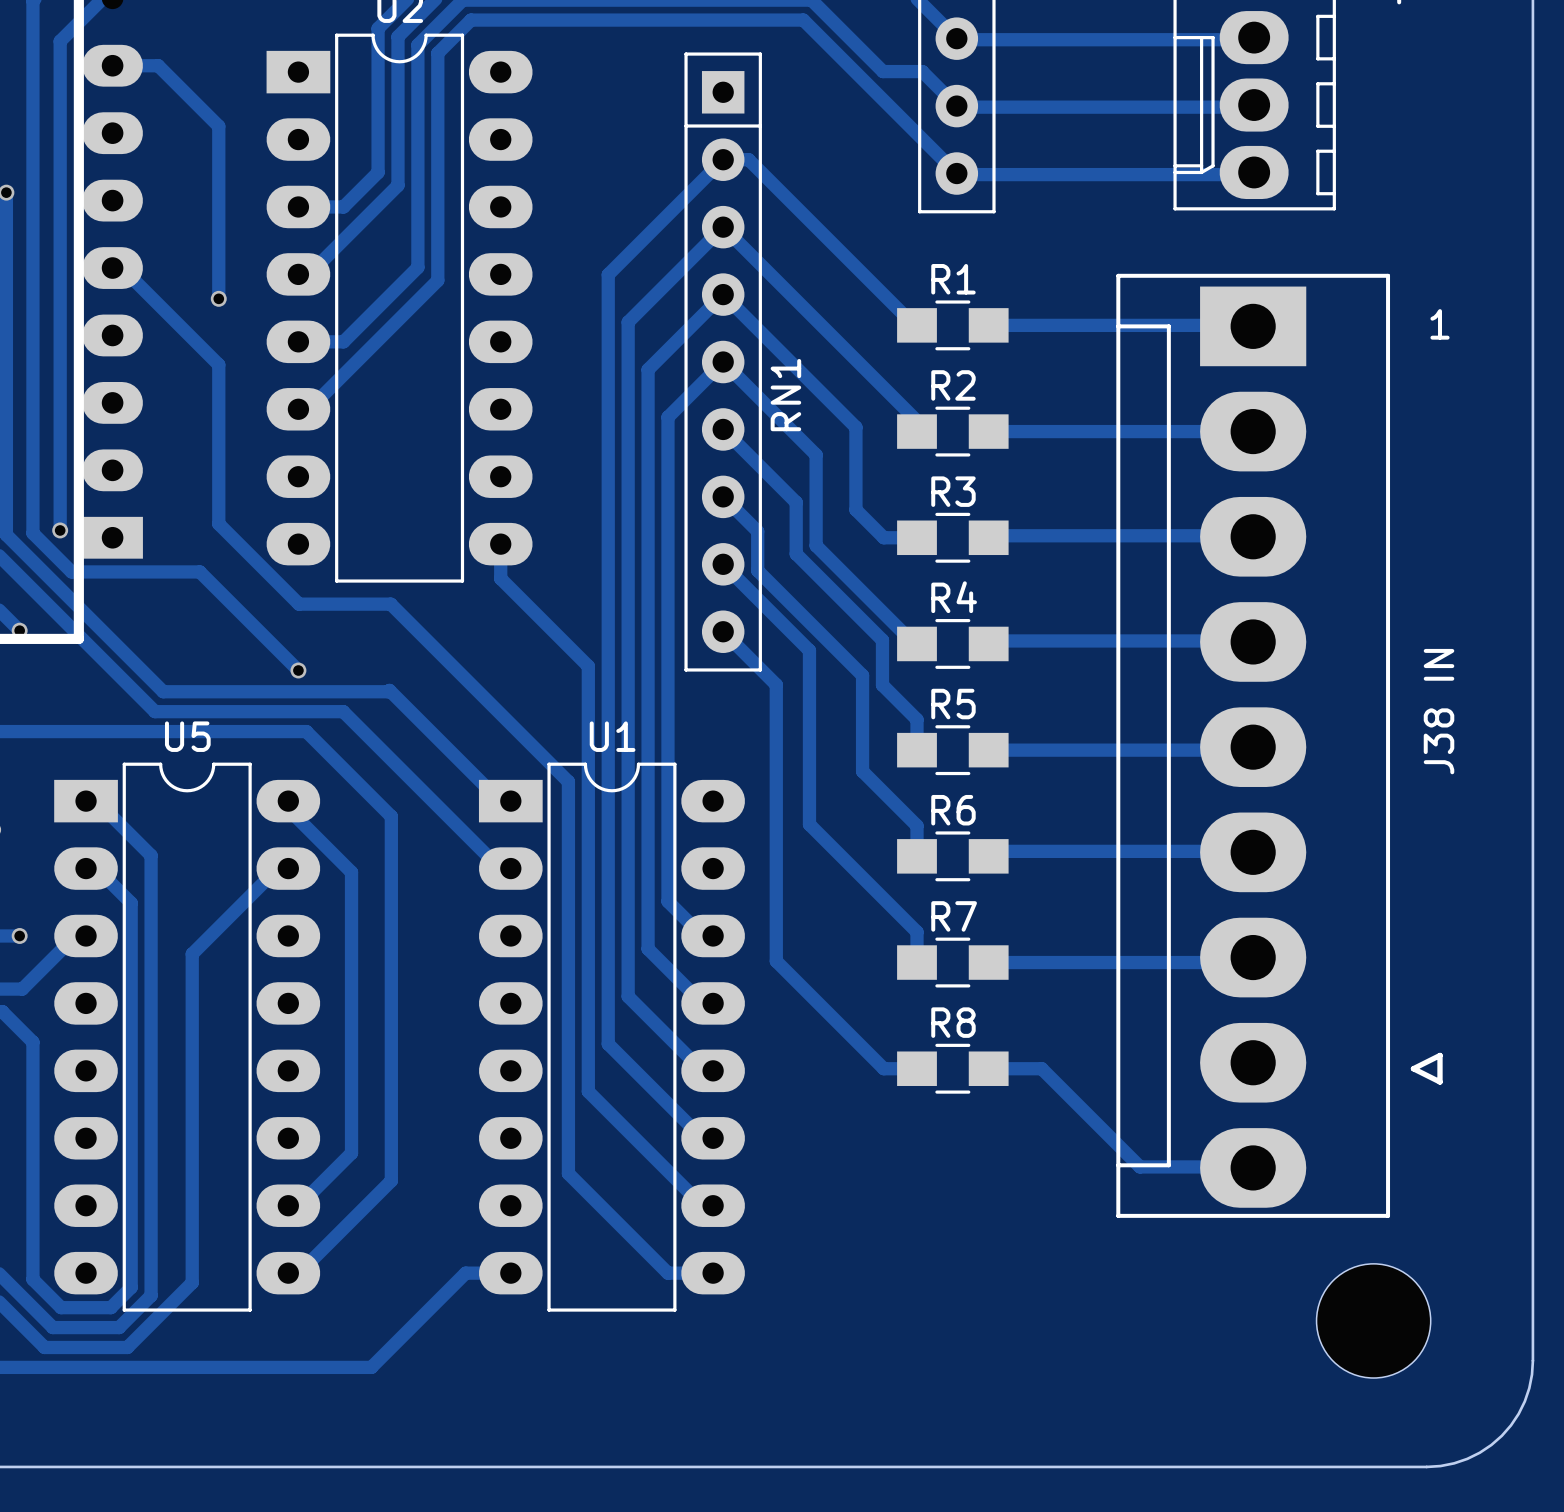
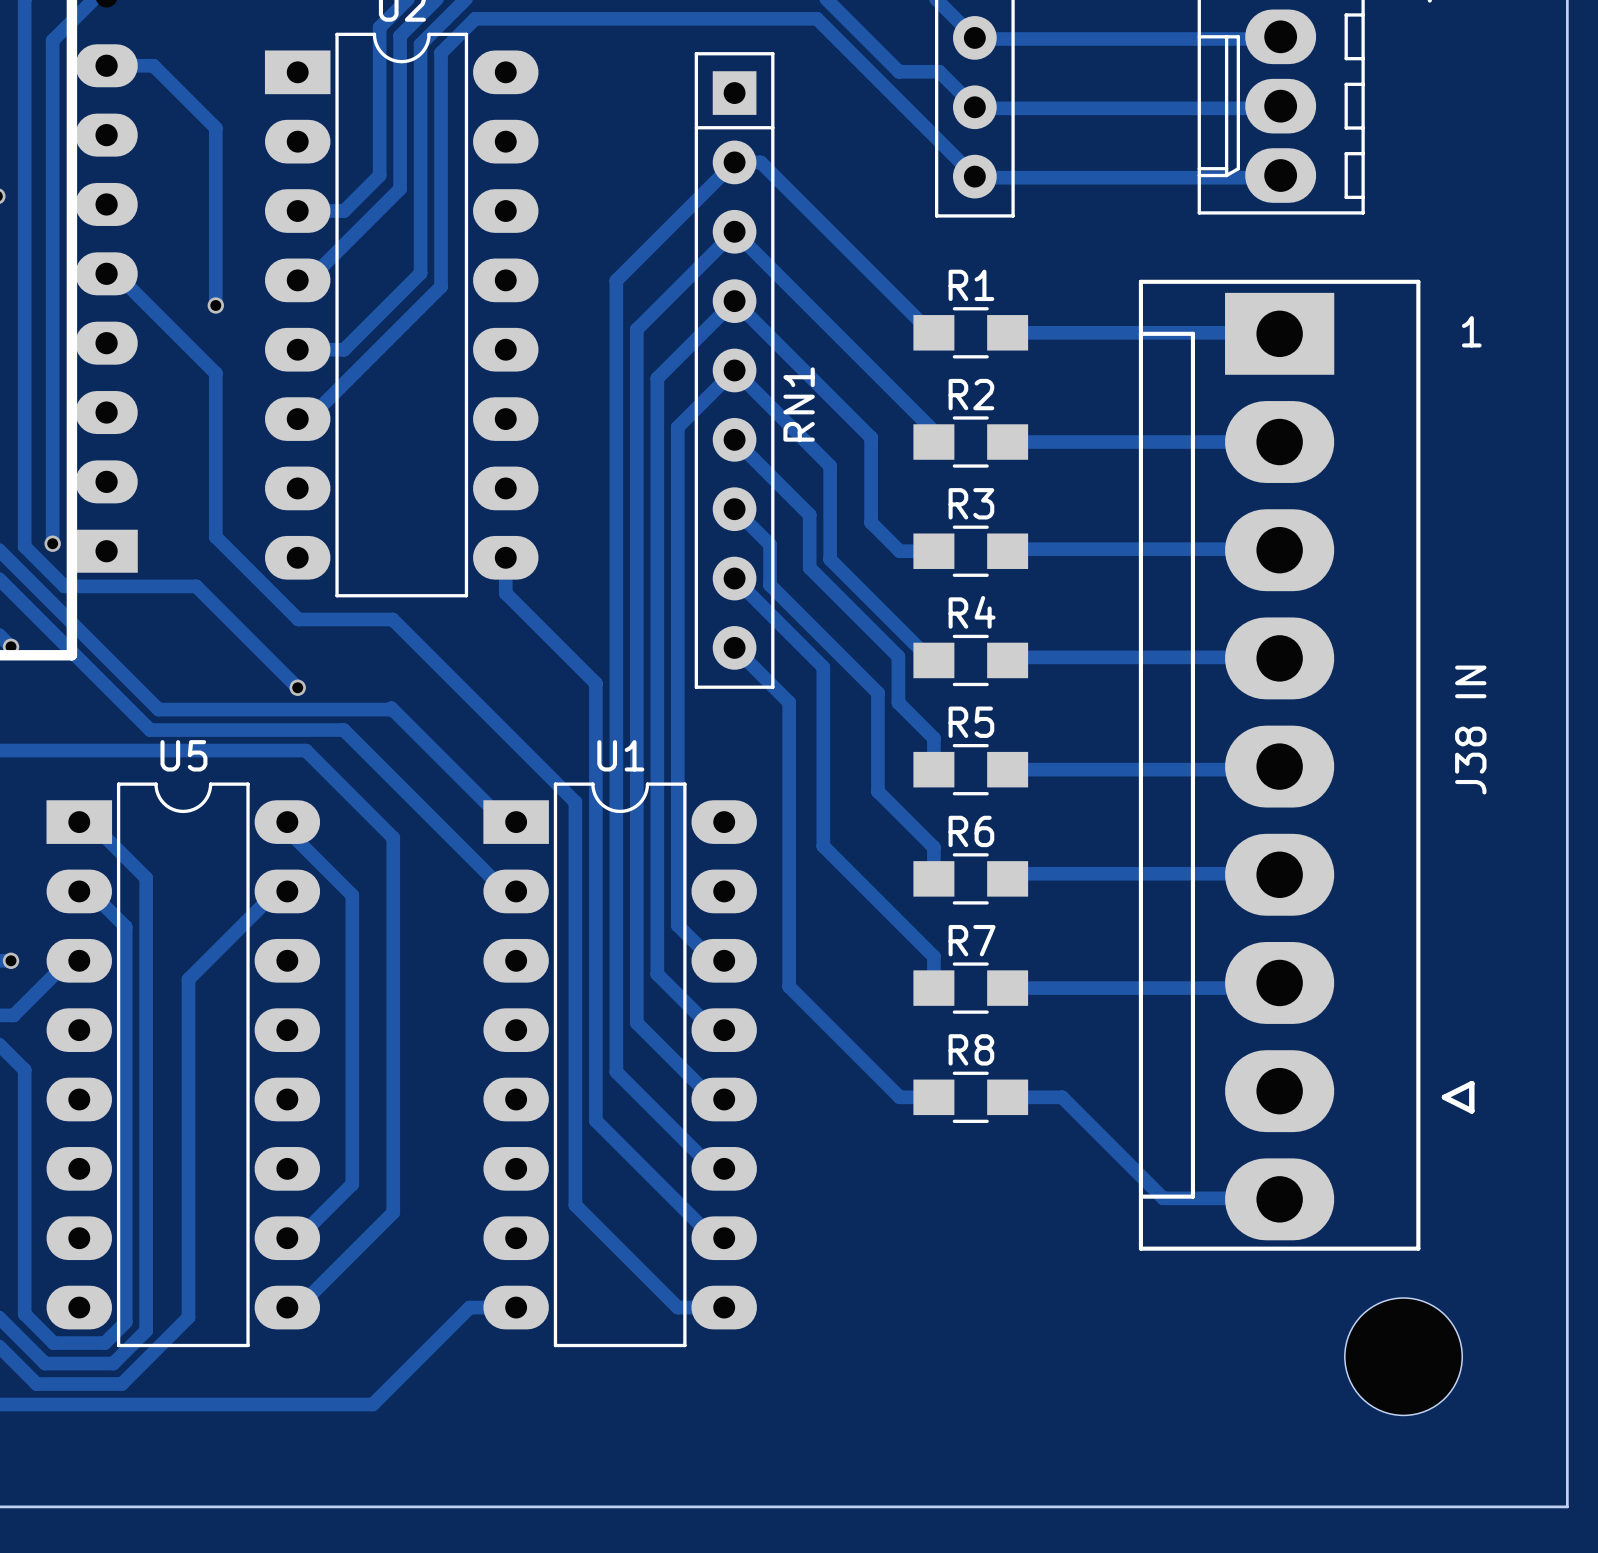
board edge: (1532, 1360) (1529, 1388) (1524, 1401) (1518, 1413) (1501, 1435) (1479, 1452) (1467, 1458) (1454, 1463) (1426, 1466) -> (1567, 1397) (1567, 1506) (1458, 1506)

